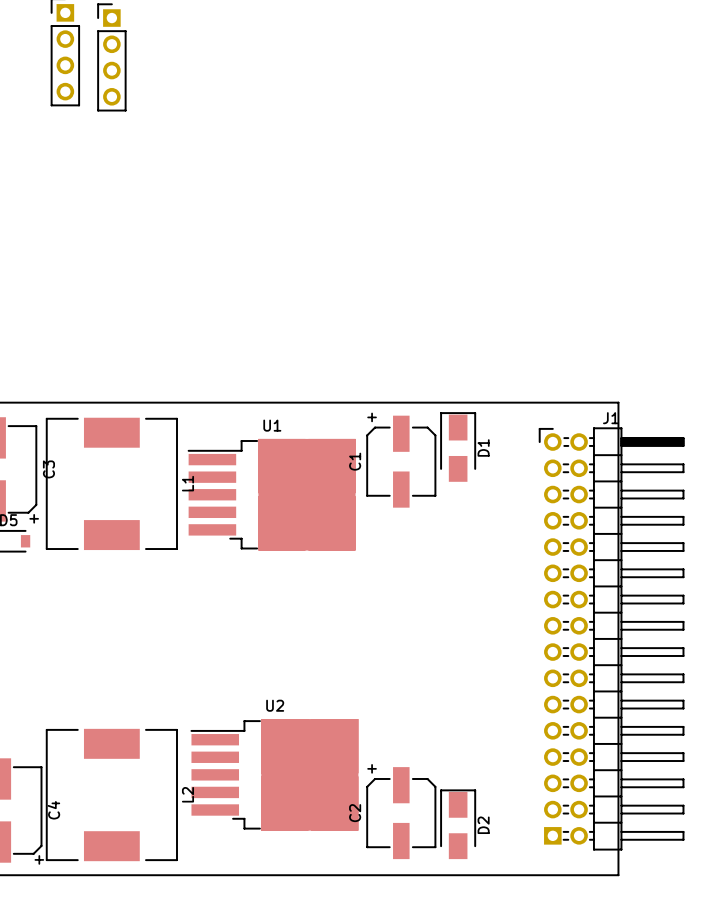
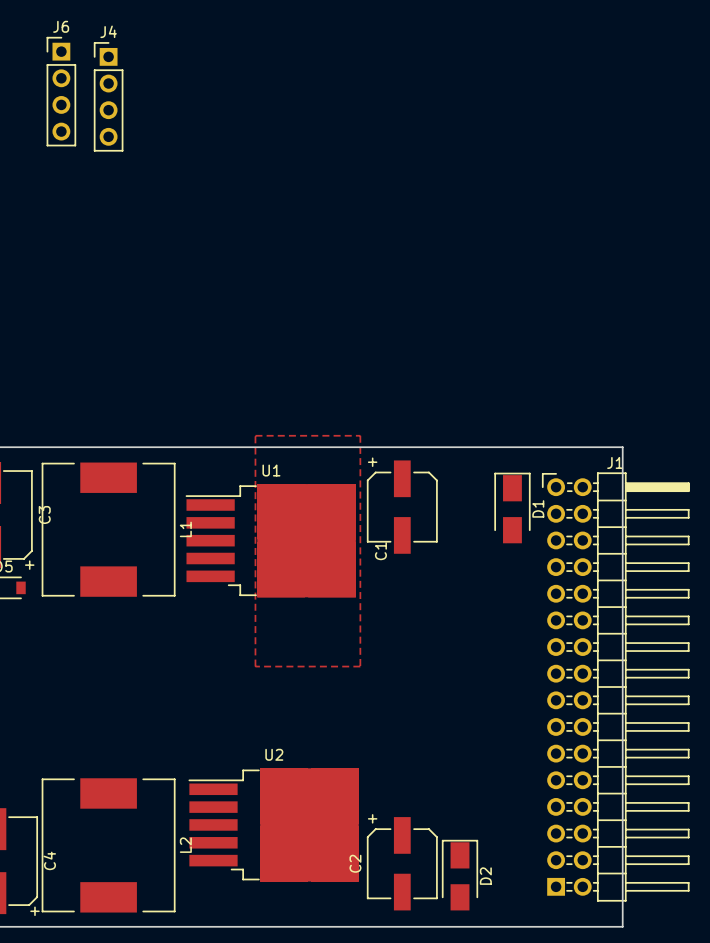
top zone outline: none -> (255, 435) (255, 666) (360, 666) (360, 435) (255, 435)
D1 position: (458, 447) -> (512, 508)
C1 name position: C1 (355, 461) -> C1 (380, 551)

